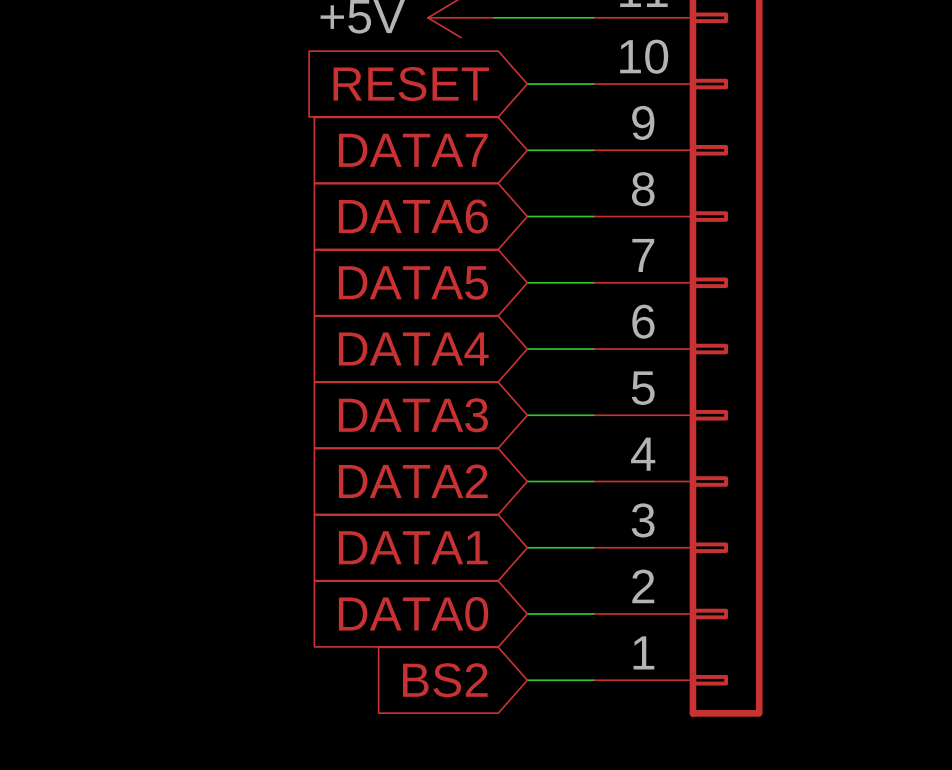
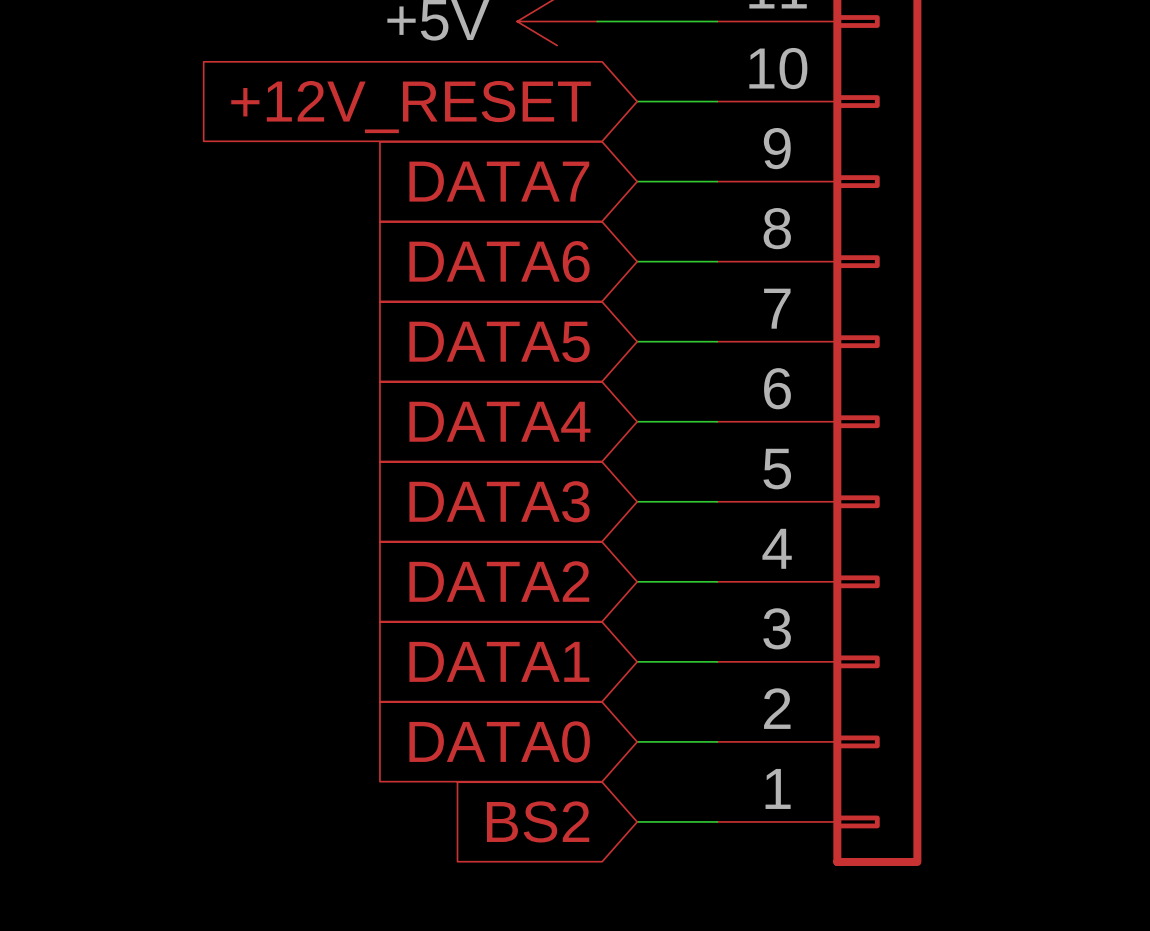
global label: RESET (411, 84) -> +12V_RESET (411, 107)

